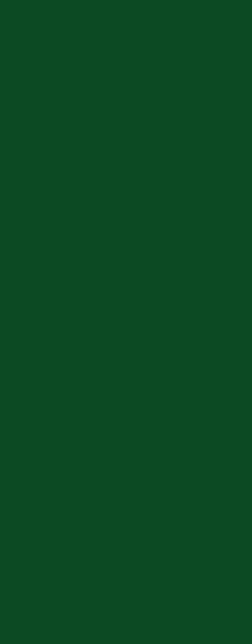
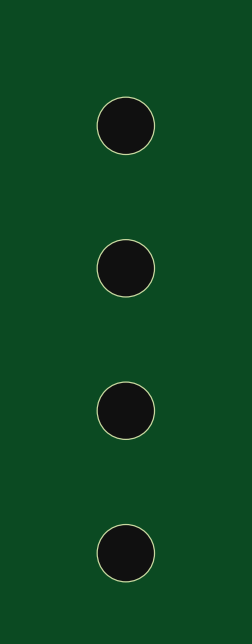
part: none -> (125, 125)
part: none -> (125, 268)
part: none -> (125, 410)
part: none -> (125, 553)

